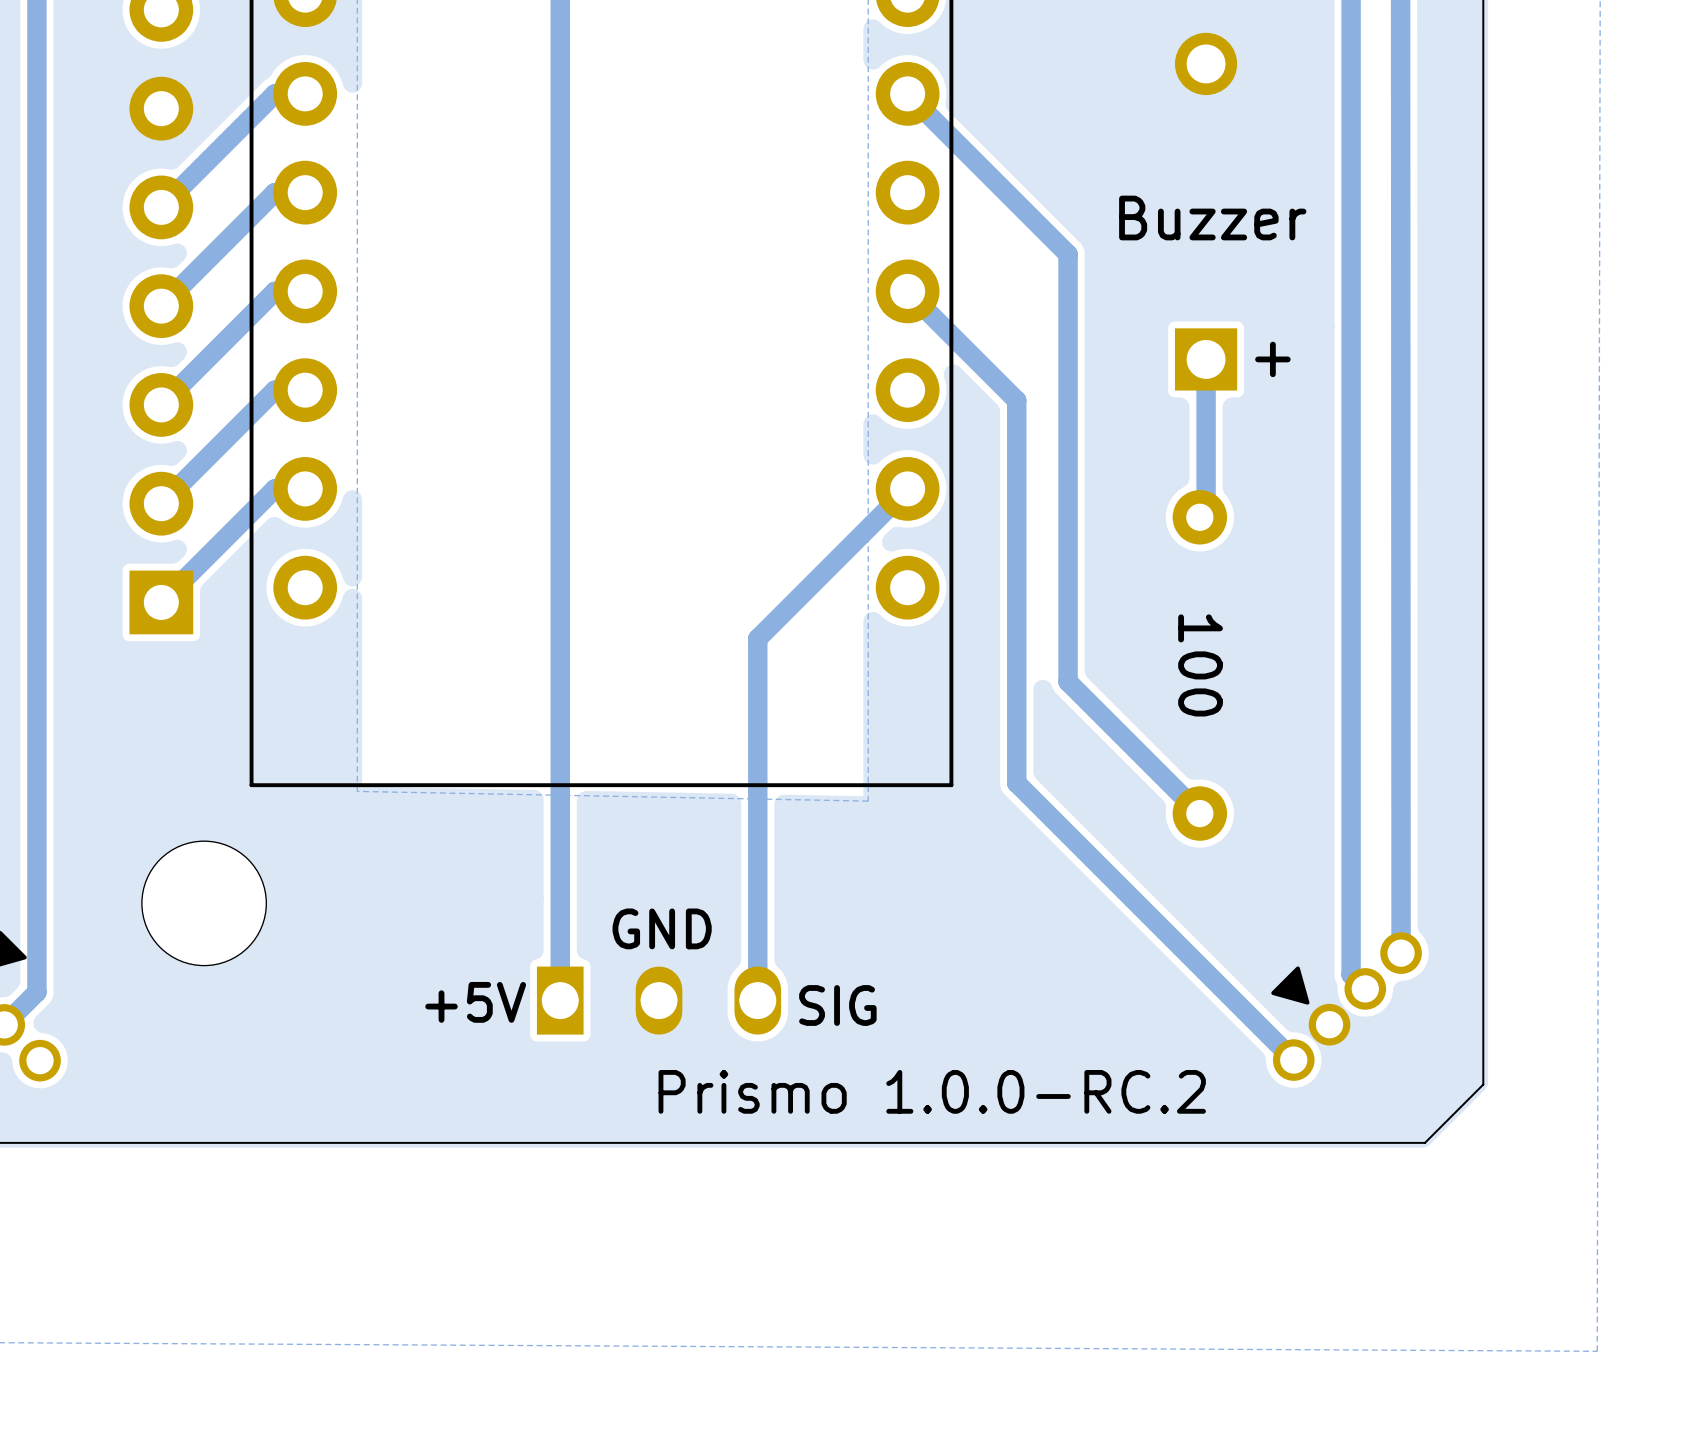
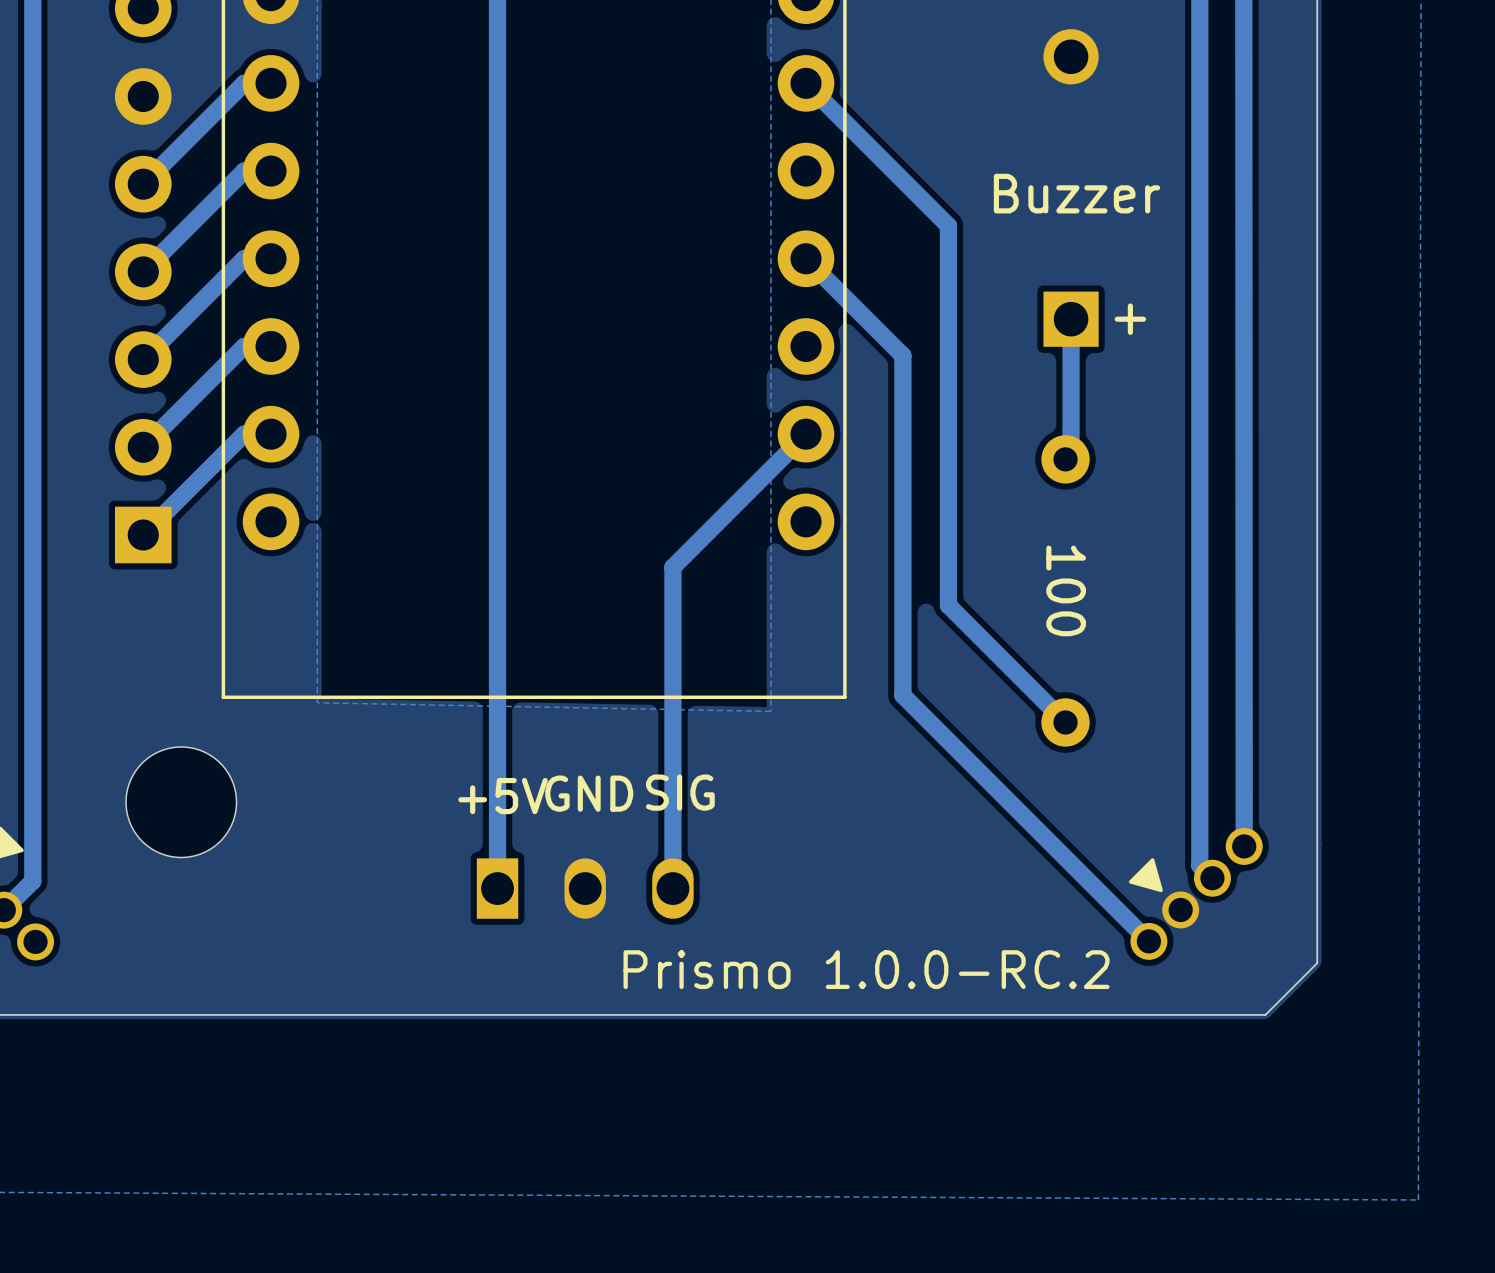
part text position: GND (662, 928) -> GND (589, 793)
part text position: +5V (475, 1002) -> +5V (503, 796)
part text position: SIG (837, 1005) -> SIG (680, 792)
text position: Prismo 1.0.0-RC.2 (932, 1091) -> Prismo 1.0.0-RC.2 (866, 969)

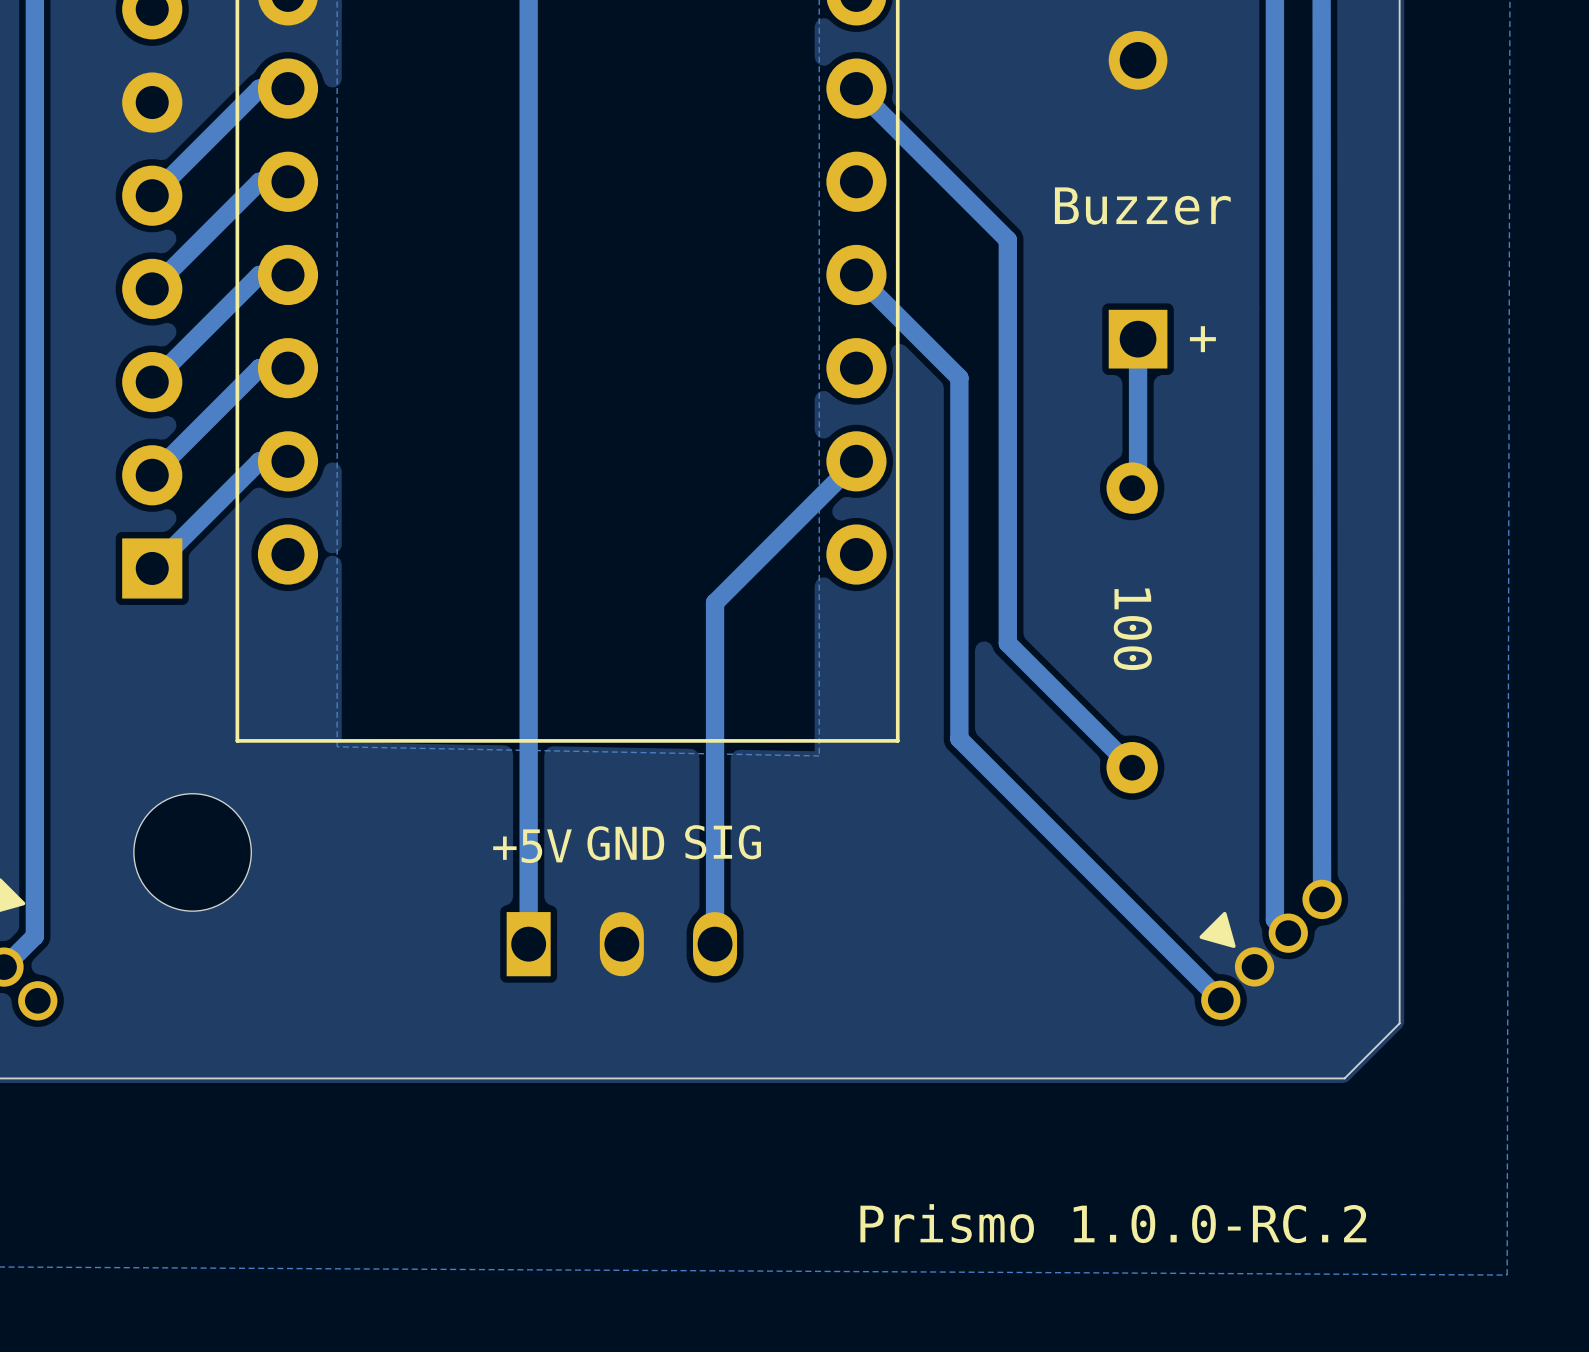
text position: Prismo 1.0.0-RC.2 (866, 969) -> Prismo 1.0.0-RC.2 (1113, 1223)

